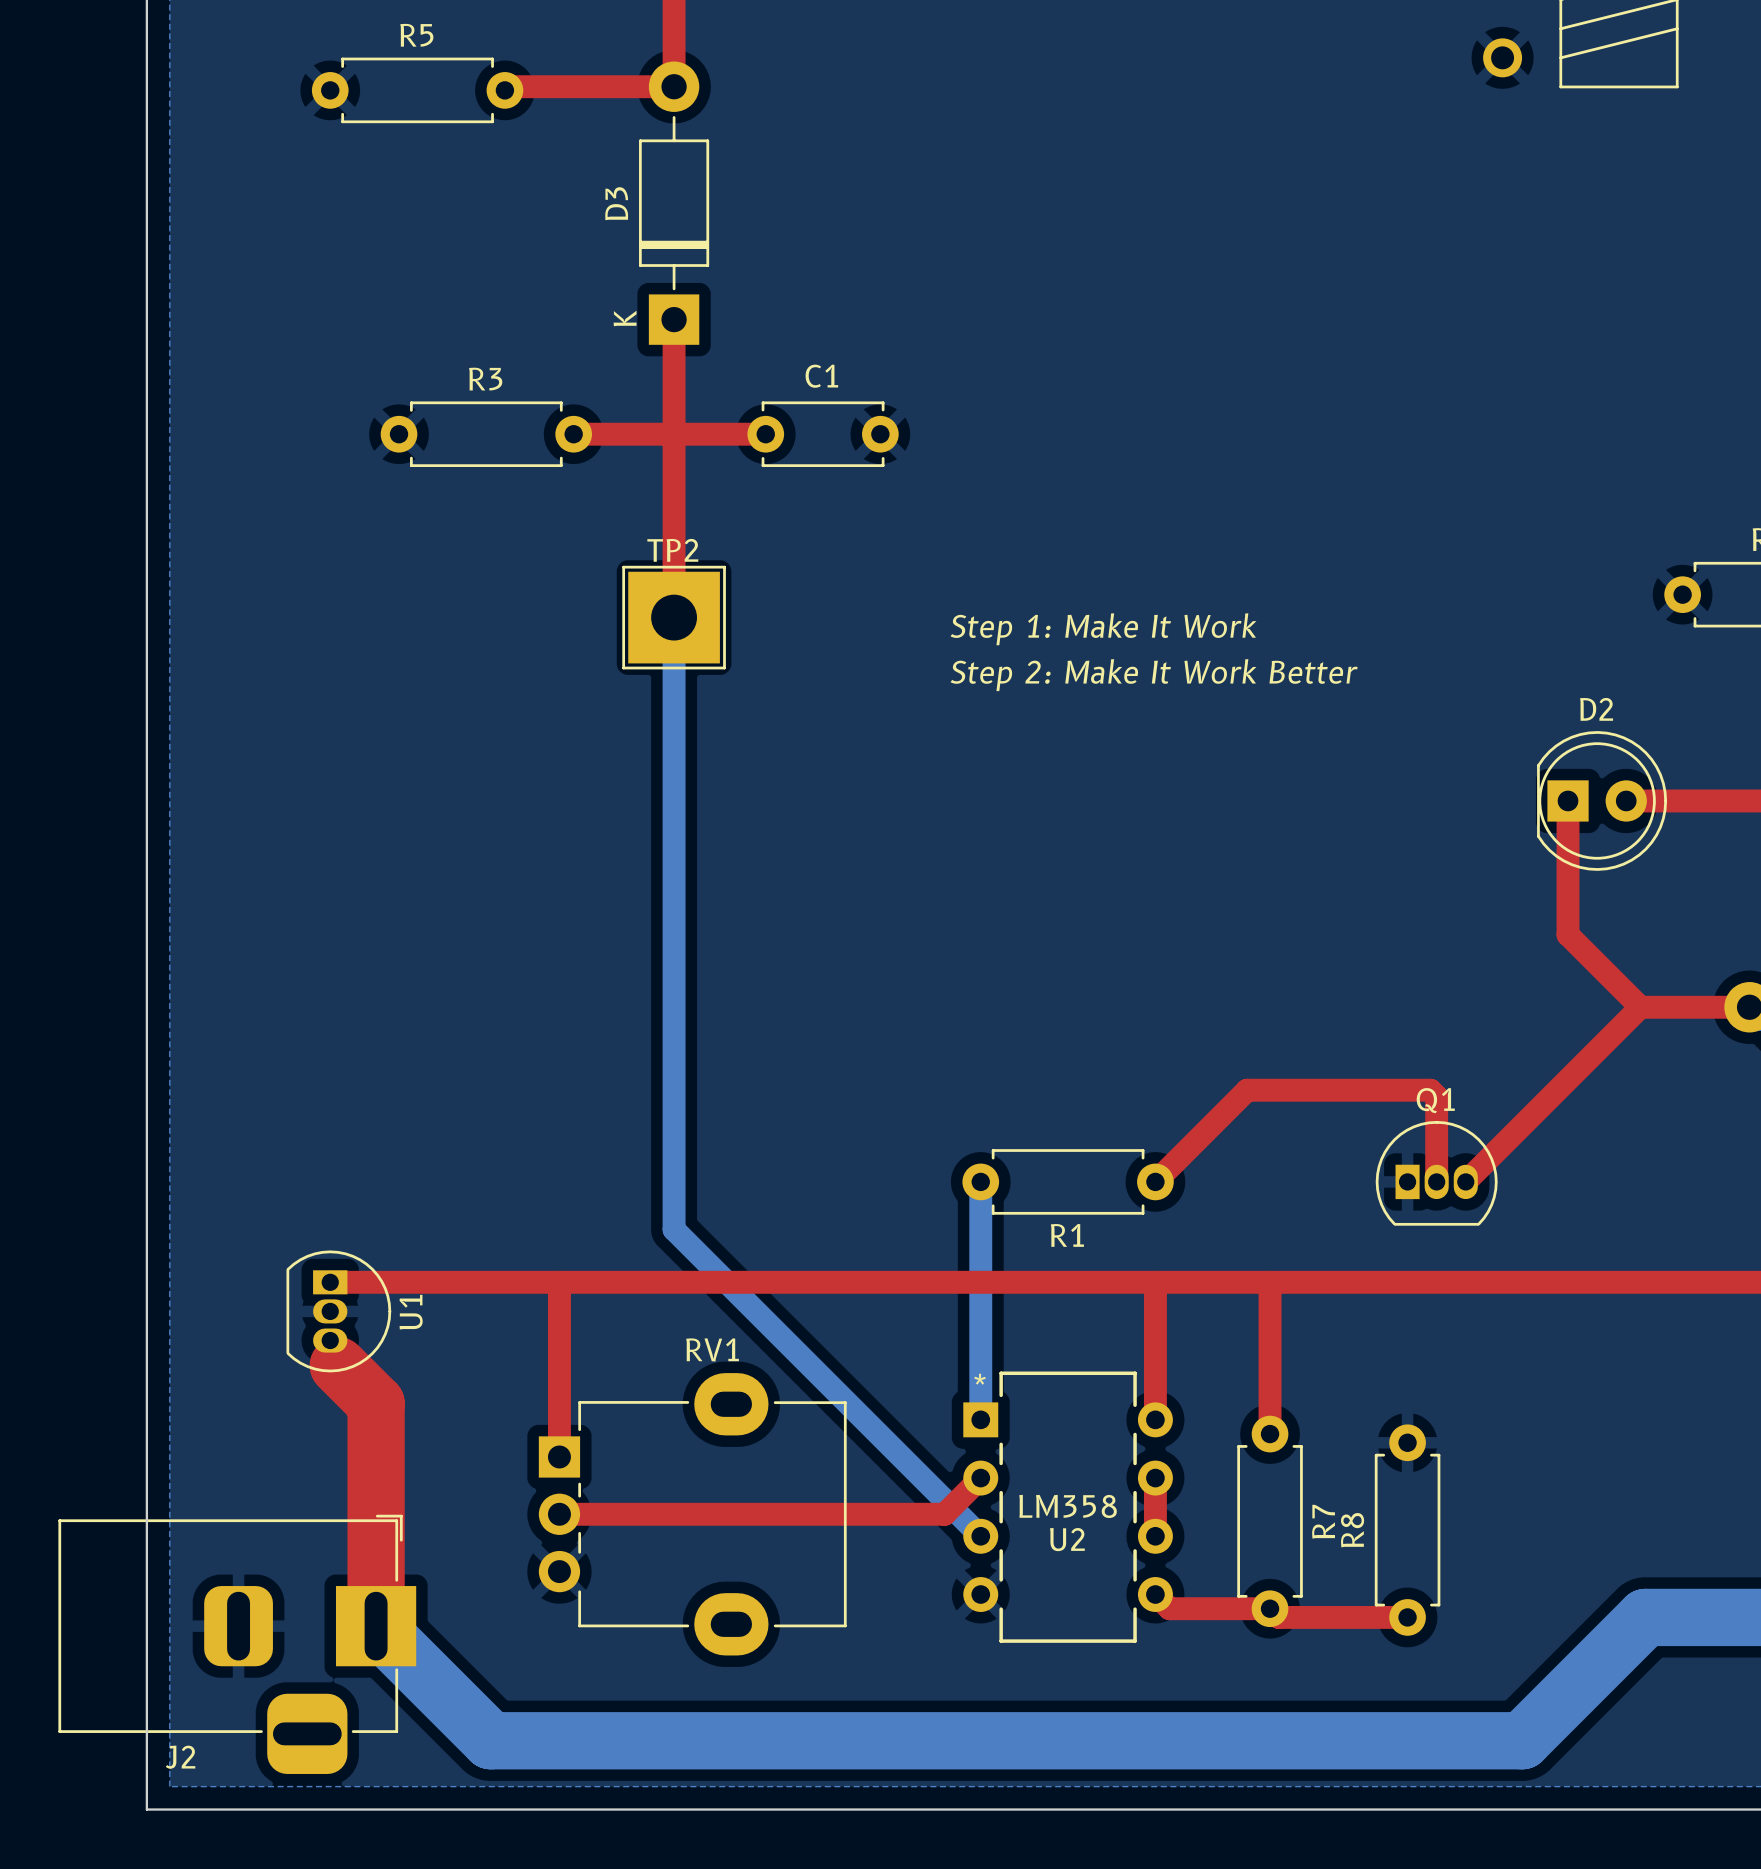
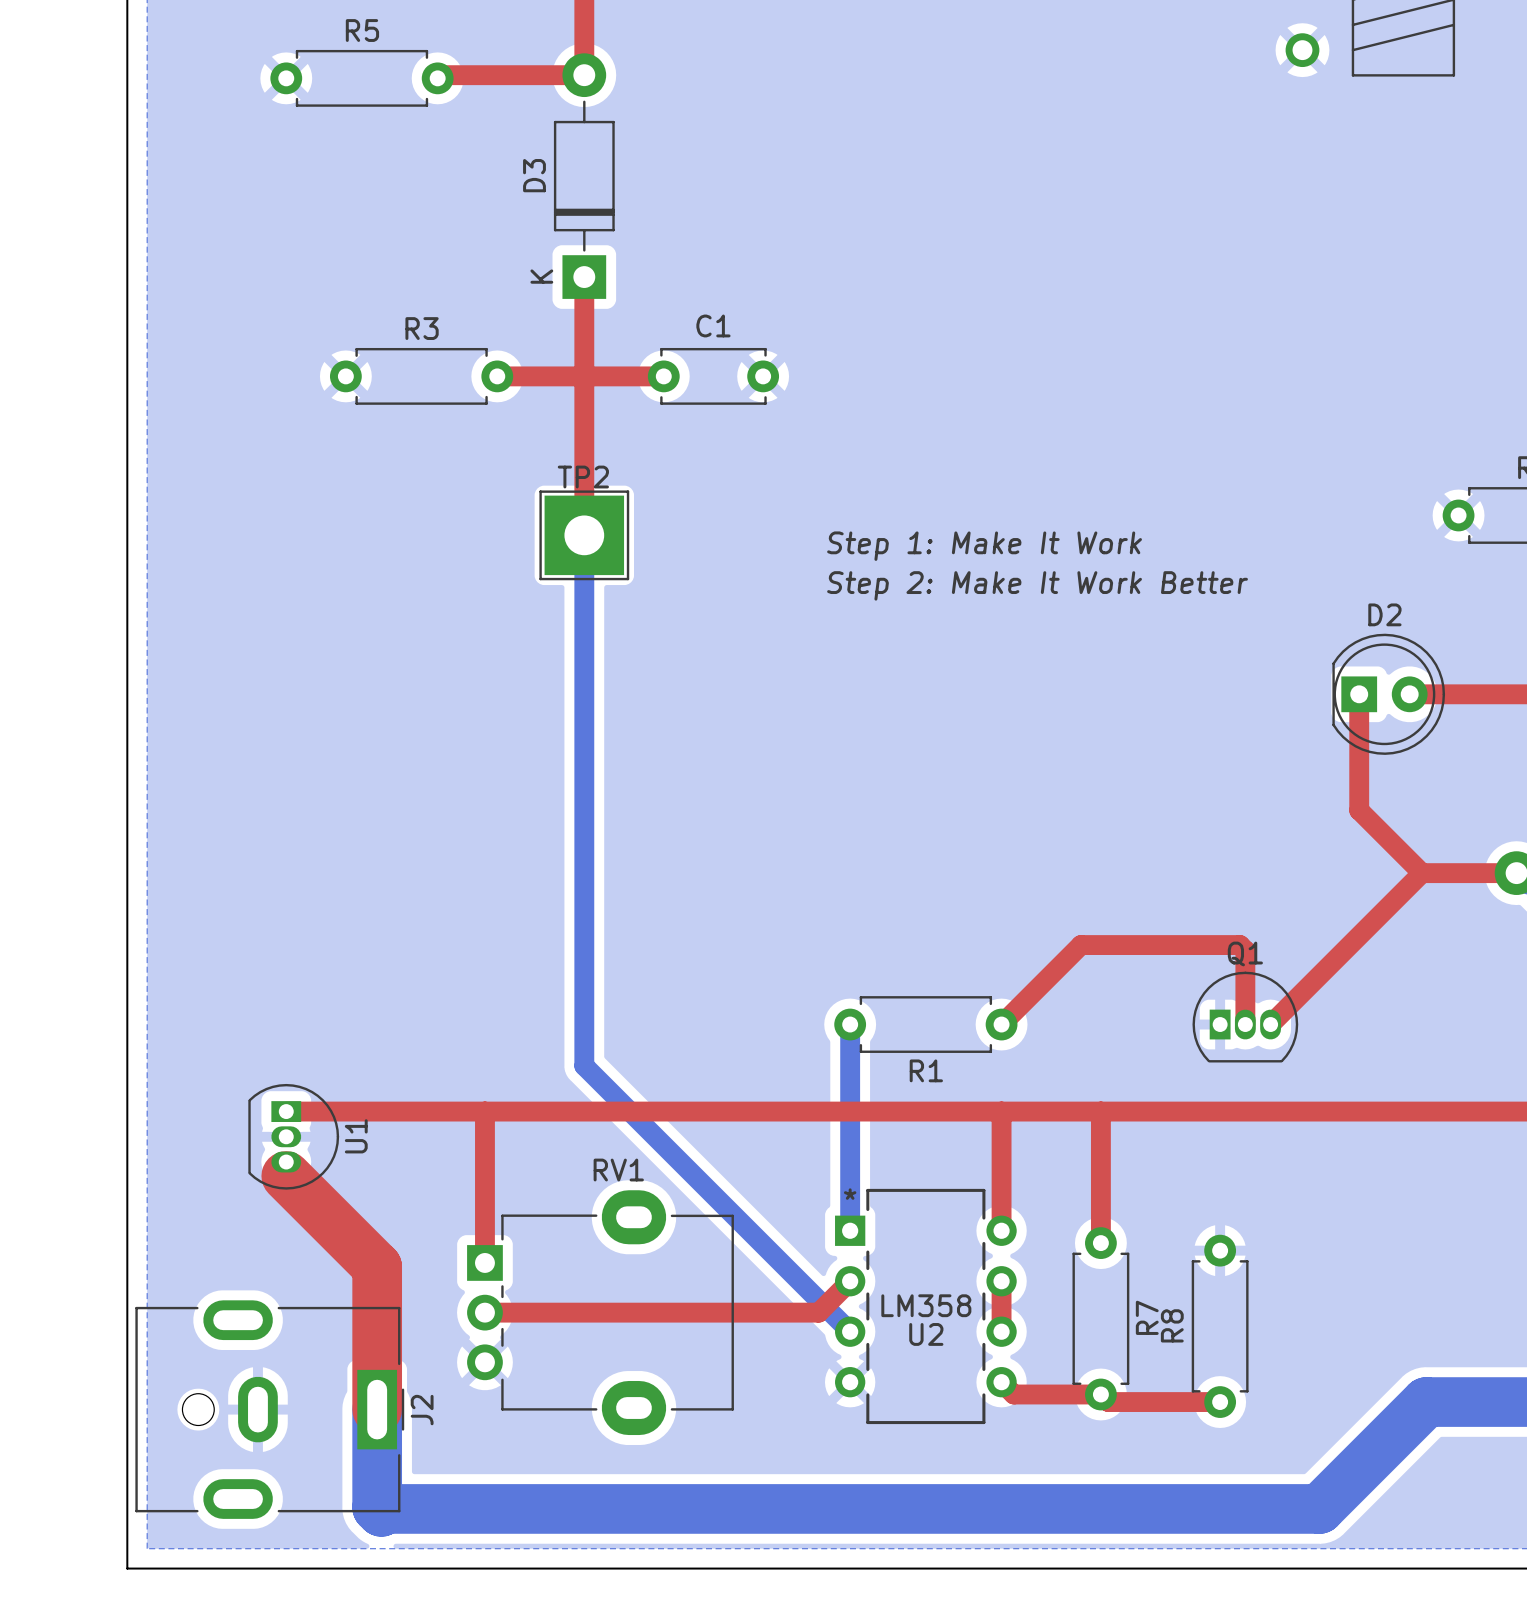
top track: none -> (286, 1176) (377, 1266) (377, 1409)
top track: (338, 1365) (376, 1403) (376, 1626) -> none
J2 footprint: [58, 1514, 417, 1774] -> [135, 1300, 405, 1519]
bottom track: (376, 1626) (490, 1740) -> (377, 1409) (377, 1507) (381, 1511) (384, 1508) (425, 1508)
J2 name position: J2 (180, 1757) -> J2 (422, 1410)

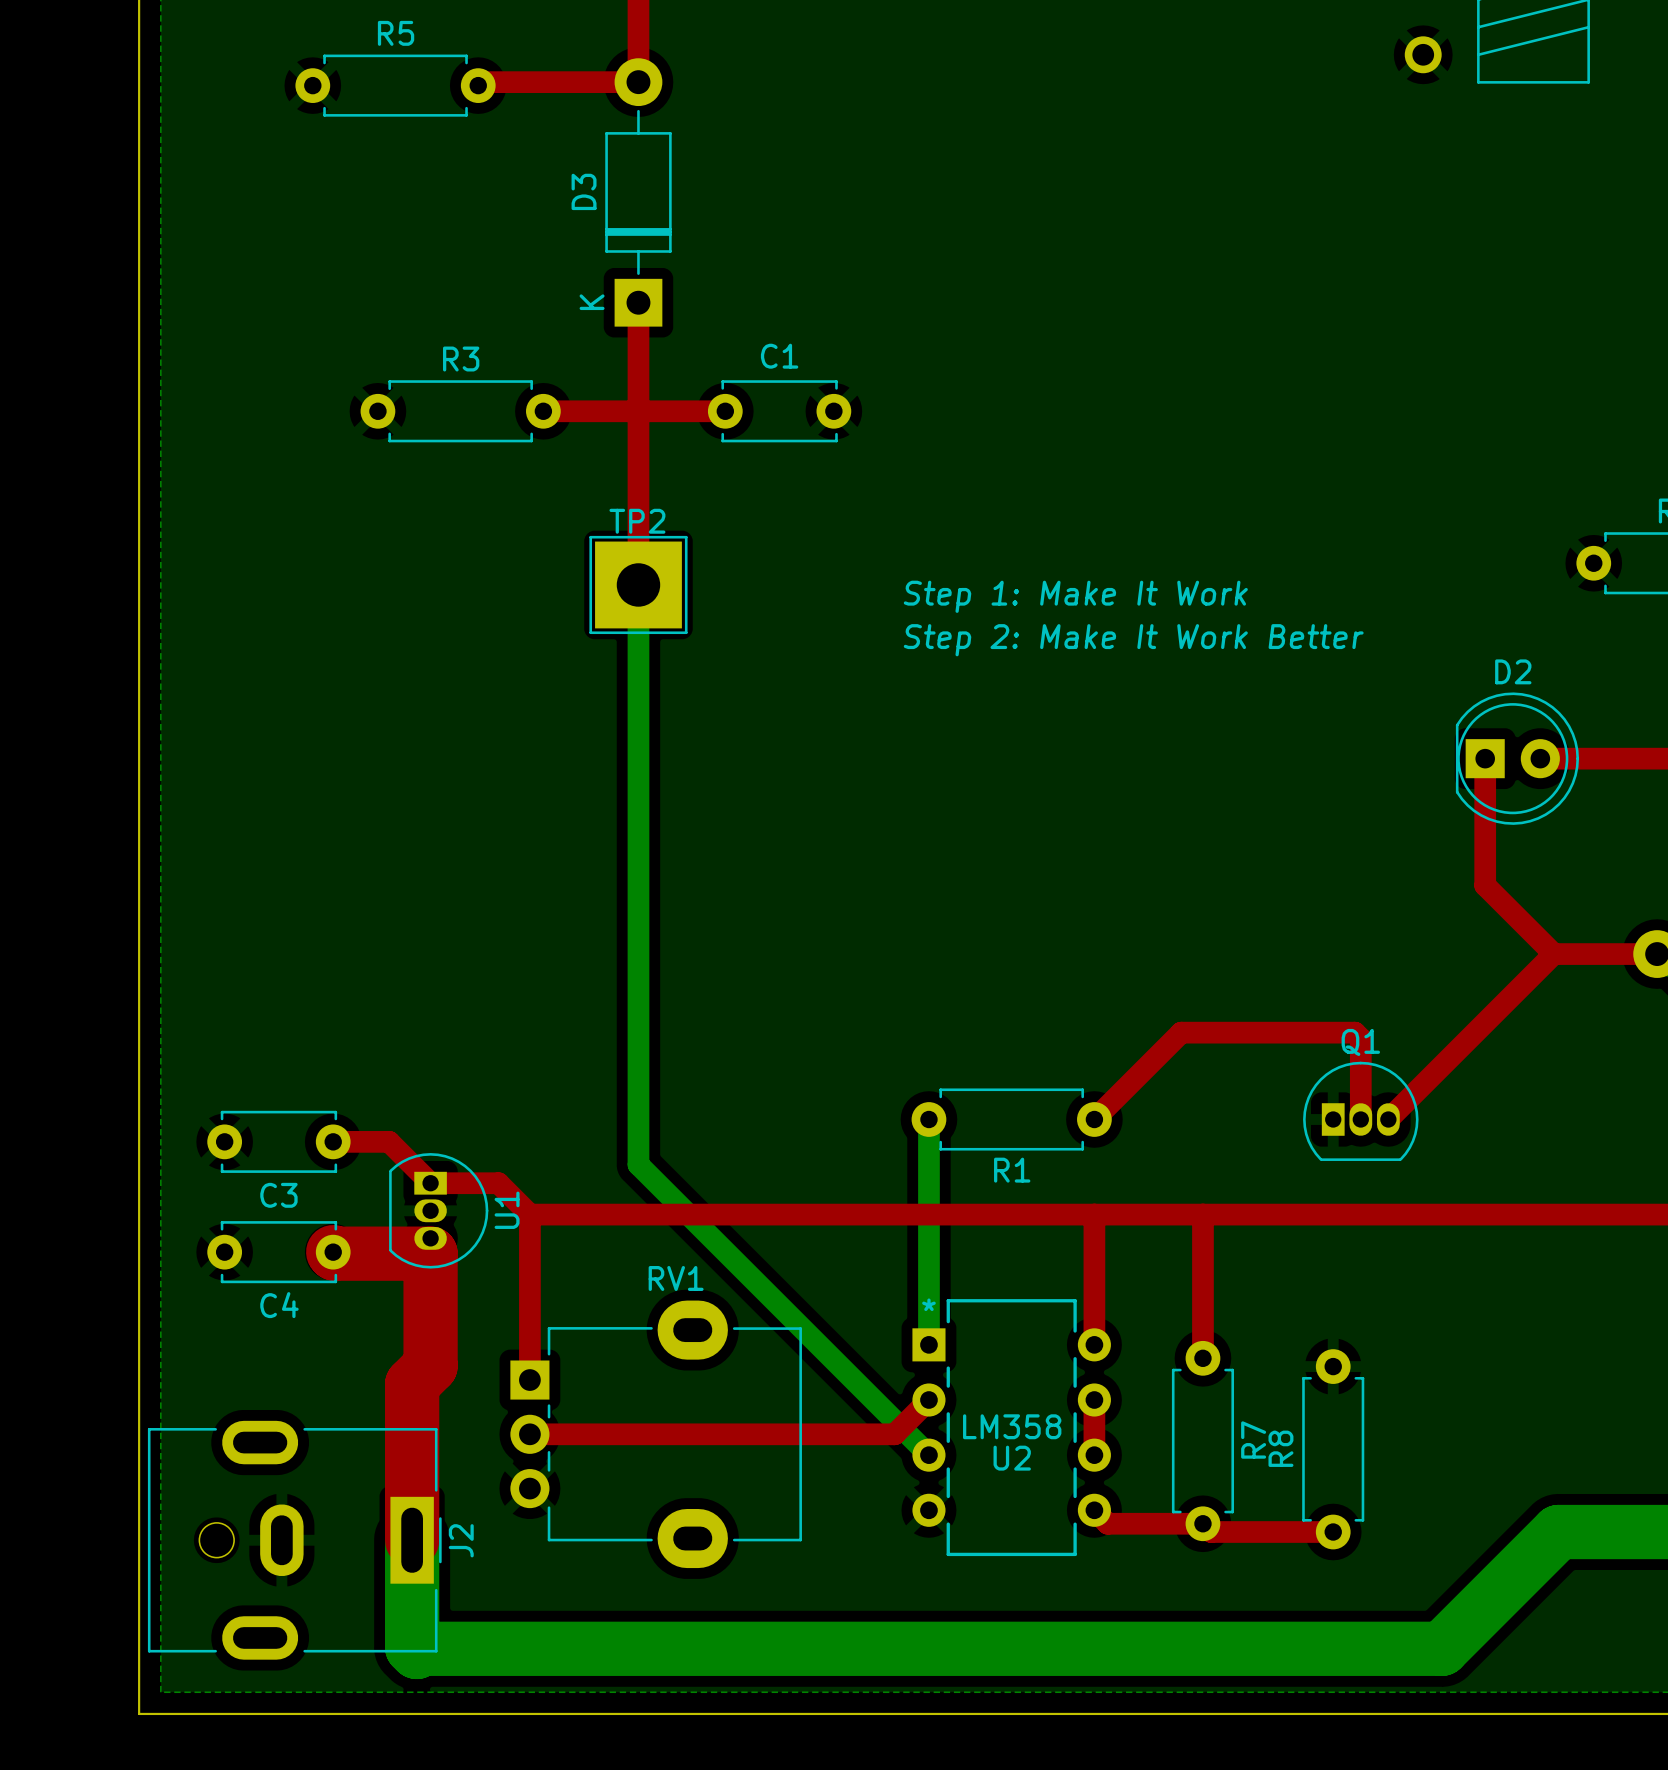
C3: none -> (278, 1141)
top track: (286, 1111) (484, 1111) -> (333, 1141) (389, 1141) (430, 1183) (498, 1183) (529, 1214)
U1 position: (293, 1136) -> (438, 1210)
C4: none -> (278, 1252)
top track: (286, 1176) (377, 1266) -> (333, 1252) (430, 1253) (430, 1365) (412, 1384)

